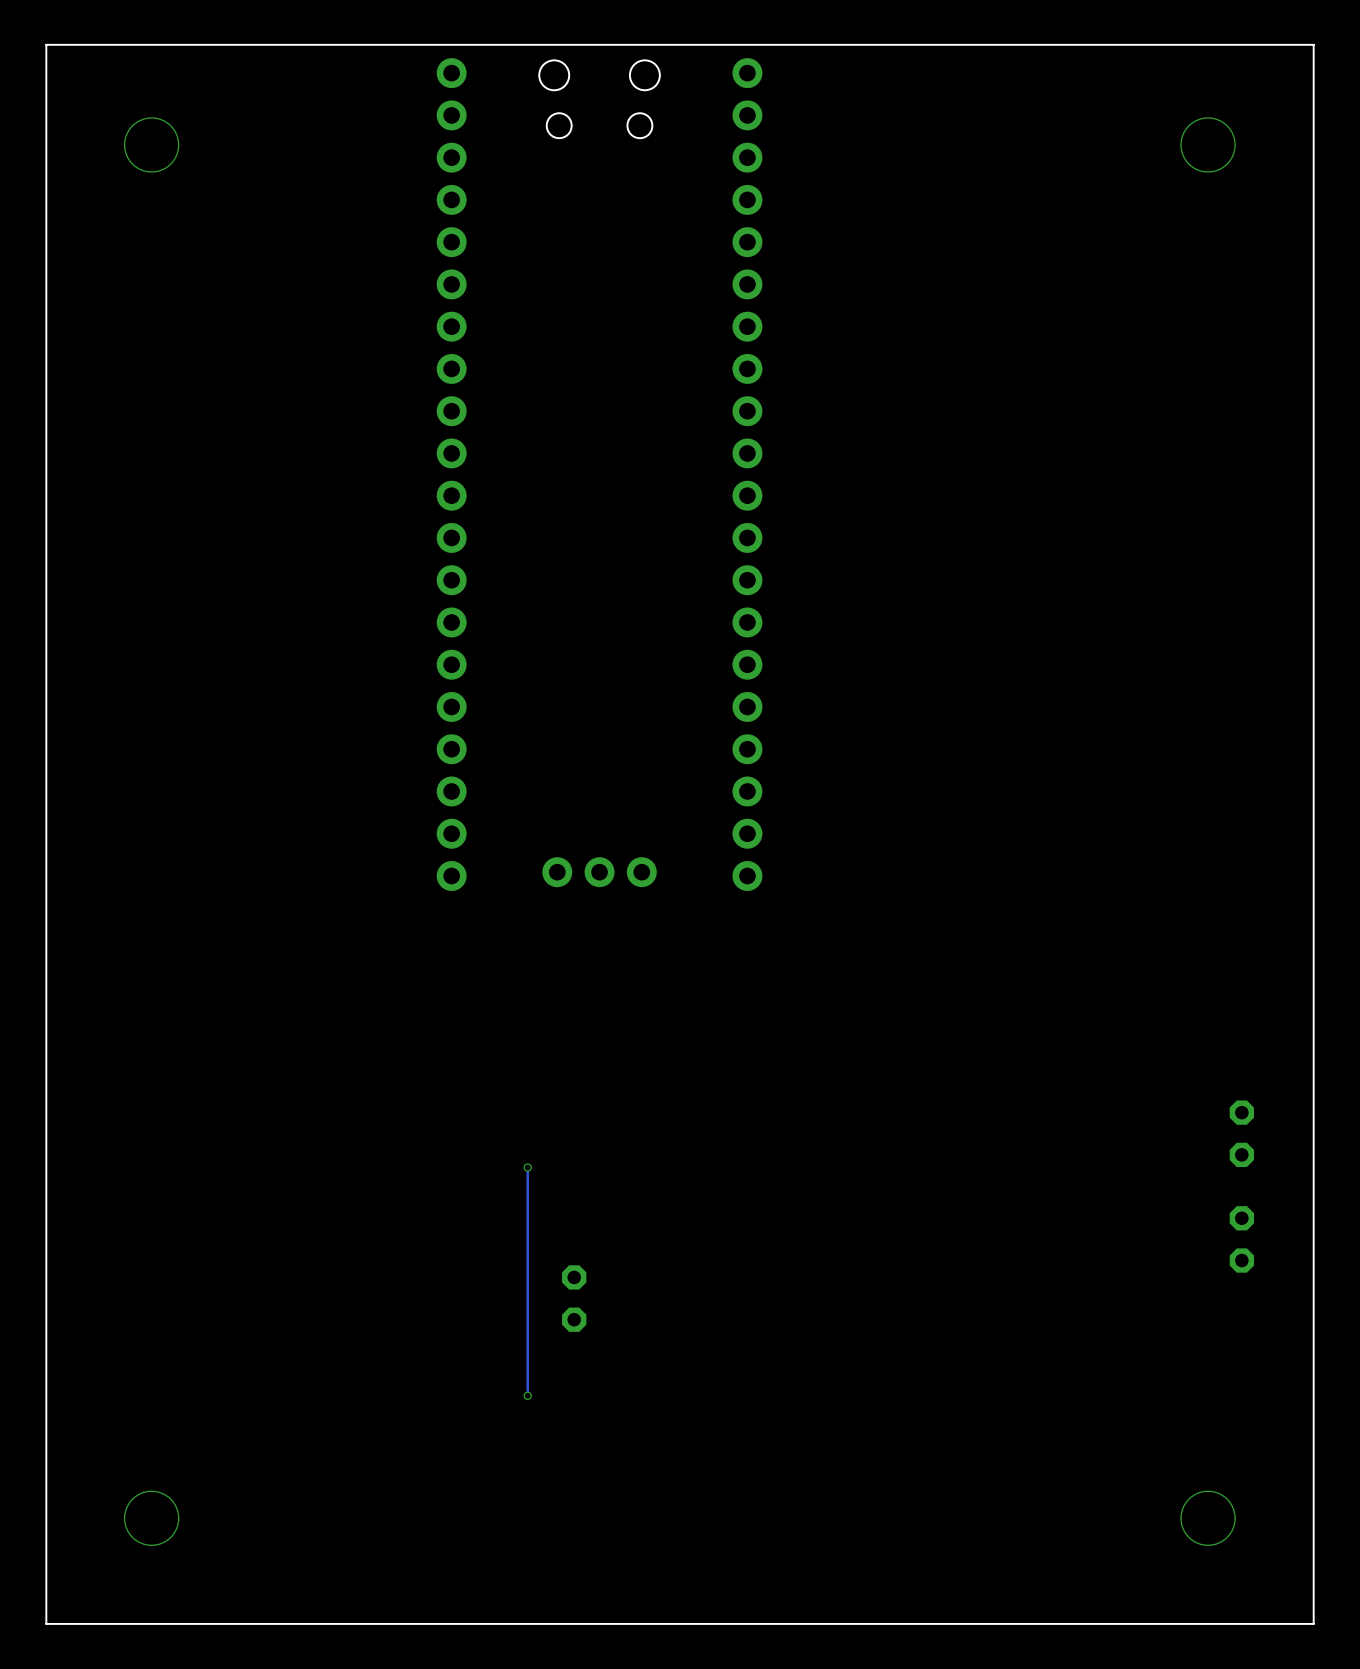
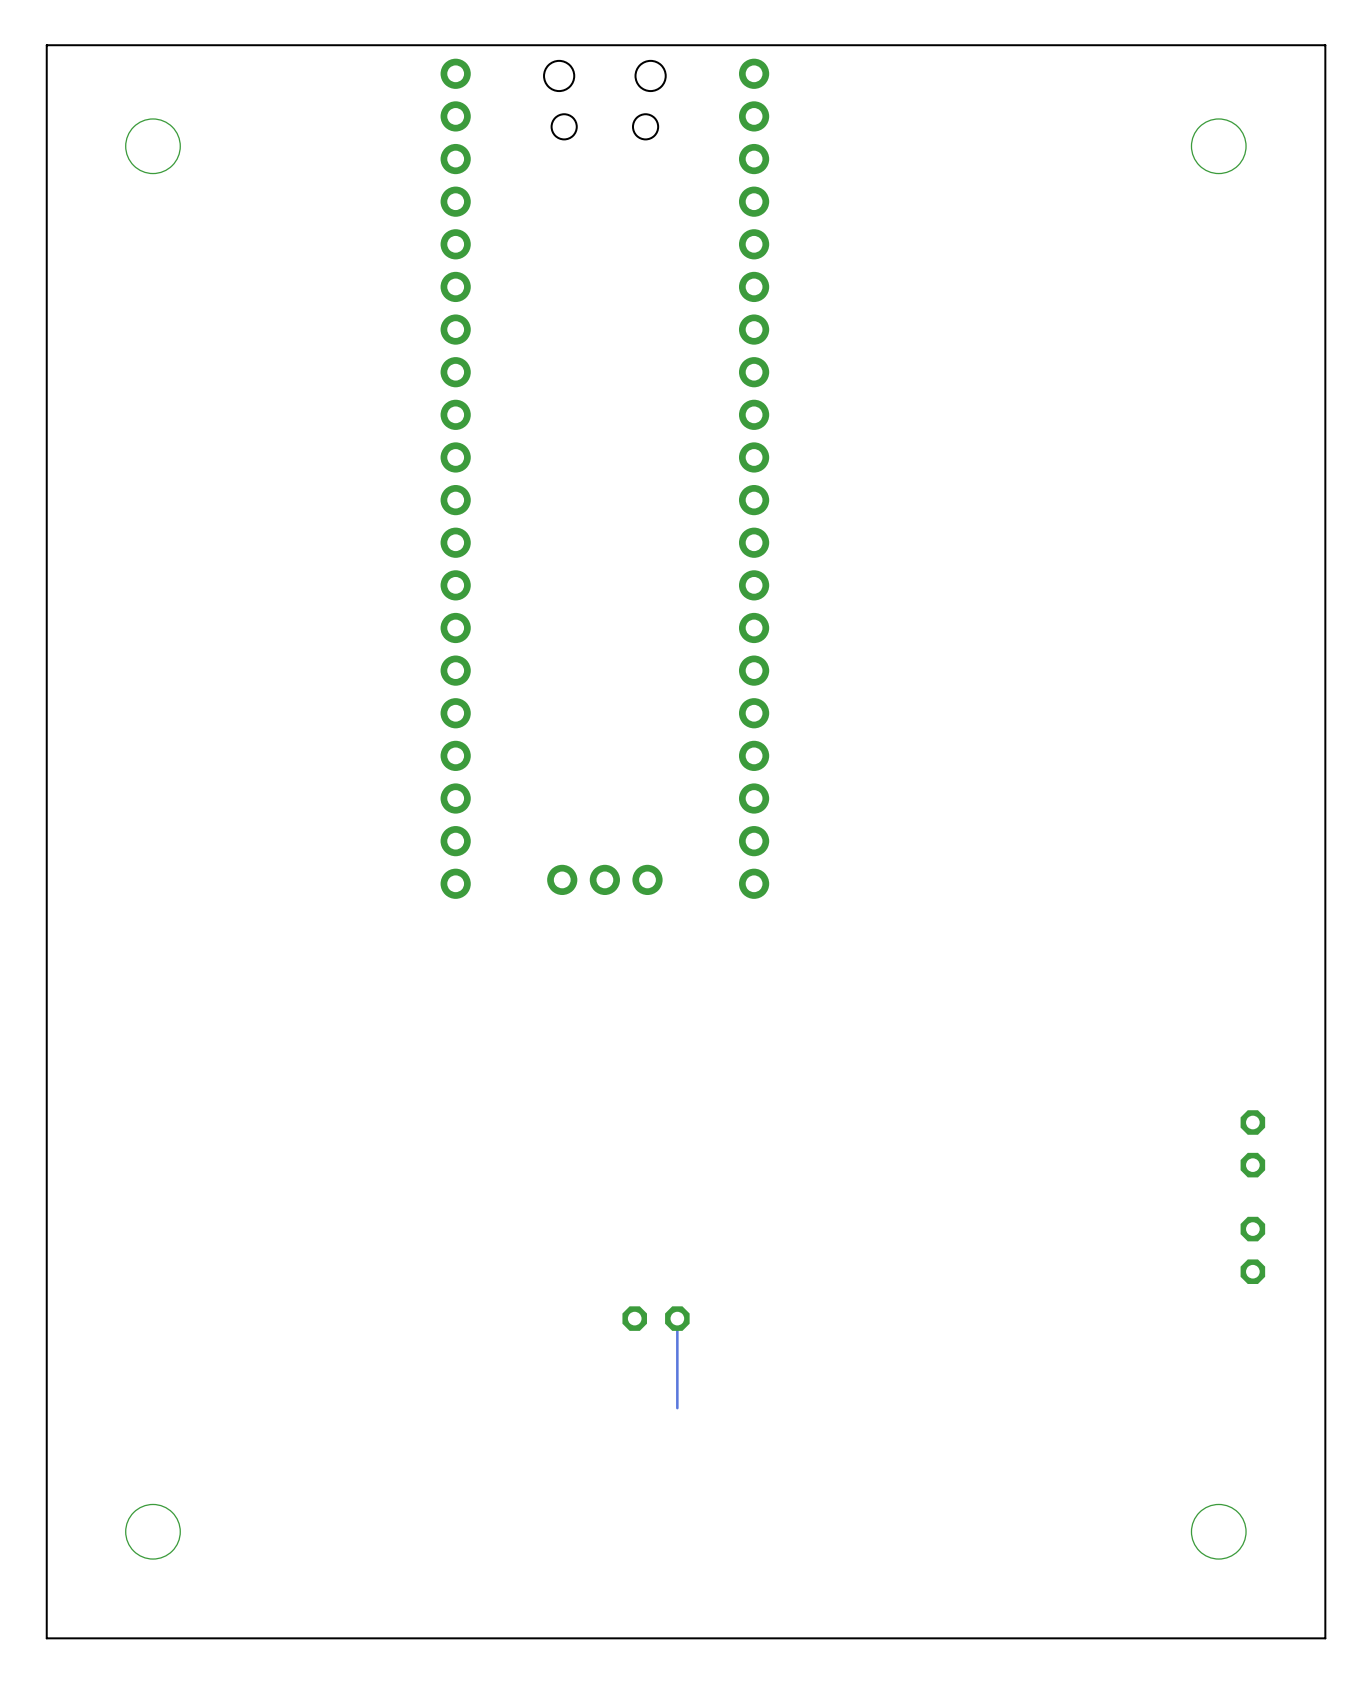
track: (527, 1167) (527, 1395) -> none
via: (527, 1167) -> none
part rotation: 0° (574, 1298) -> 90° clockwise (656, 1318)
part position: (574, 1298) -> (656, 1318)
track: none -> (677, 1318) (677, 1408)
via: (527, 1395) -> none

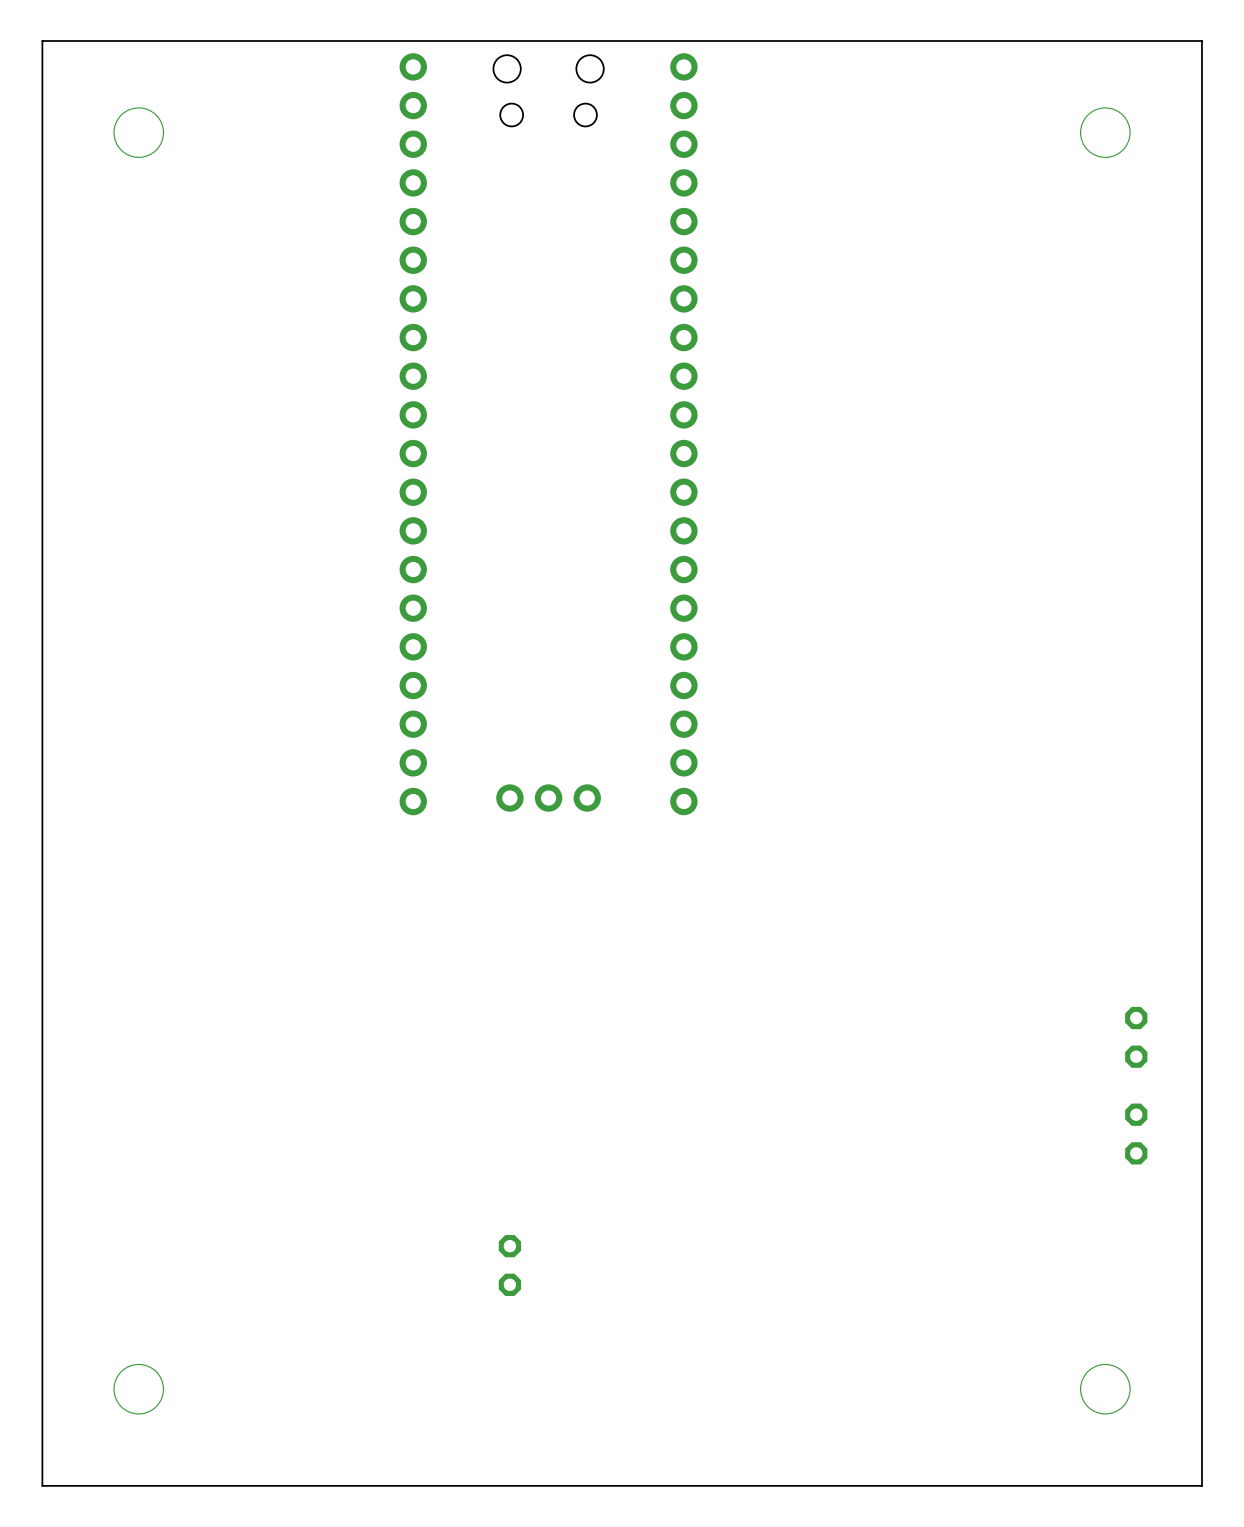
part rotation: 0° (656, 1318) -> 90° clockwise (509, 1265)
part position: (656, 1318) -> (509, 1265)
track: (677, 1318) (677, 1408) -> none

